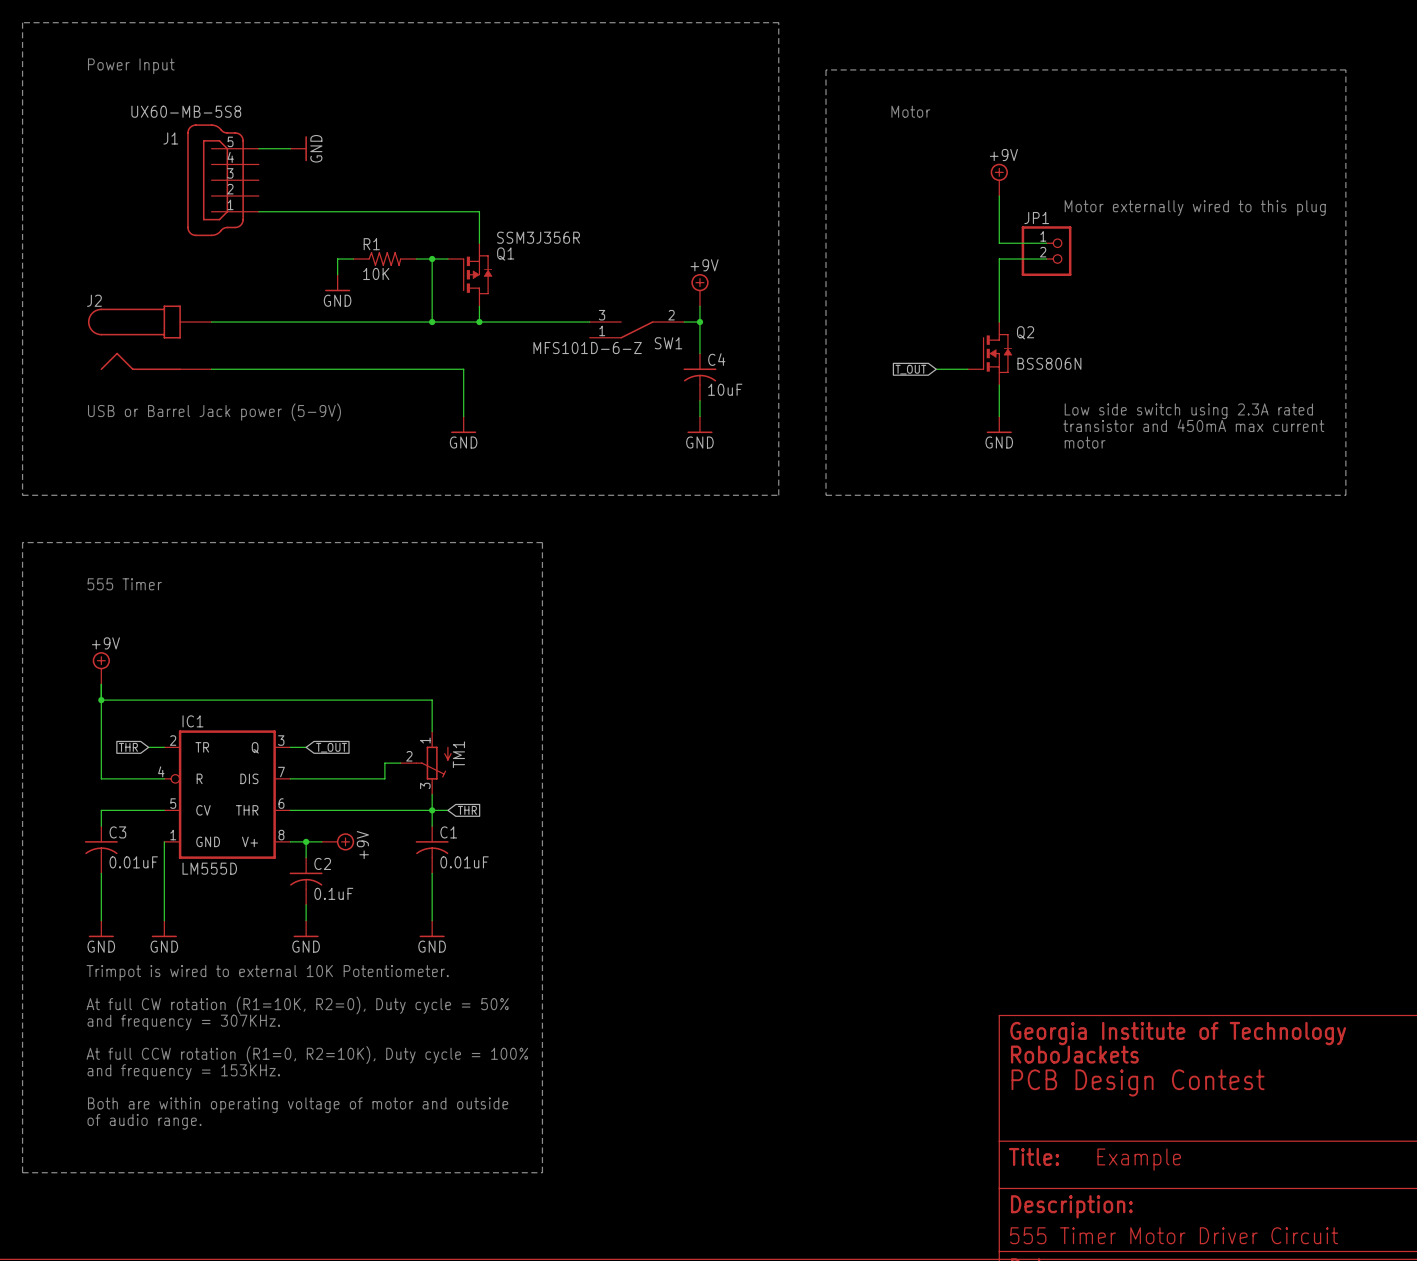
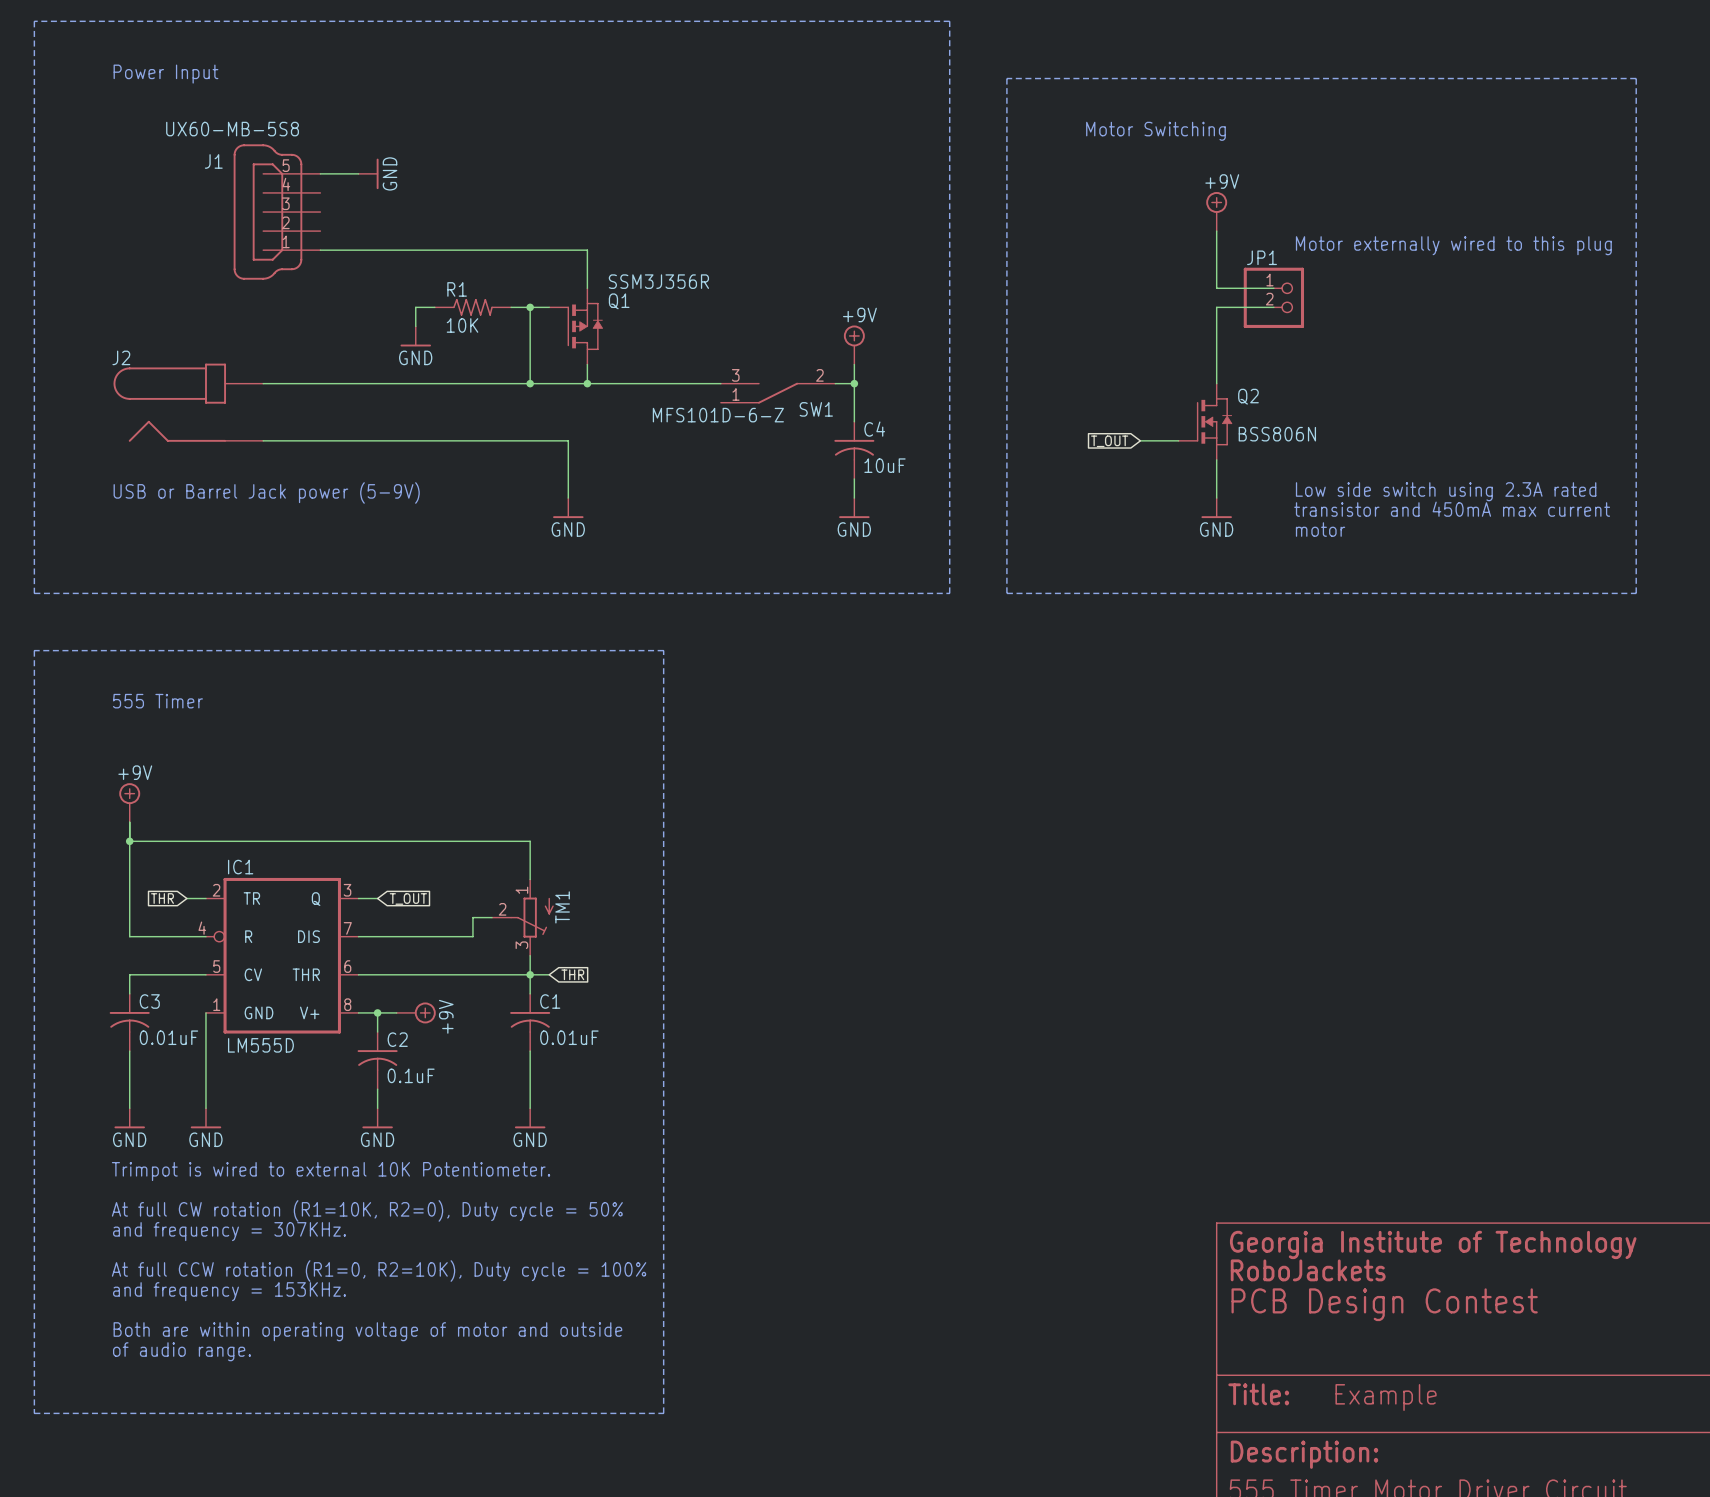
text: Motor (910, 111) -> Motor Switching (1155, 131)

